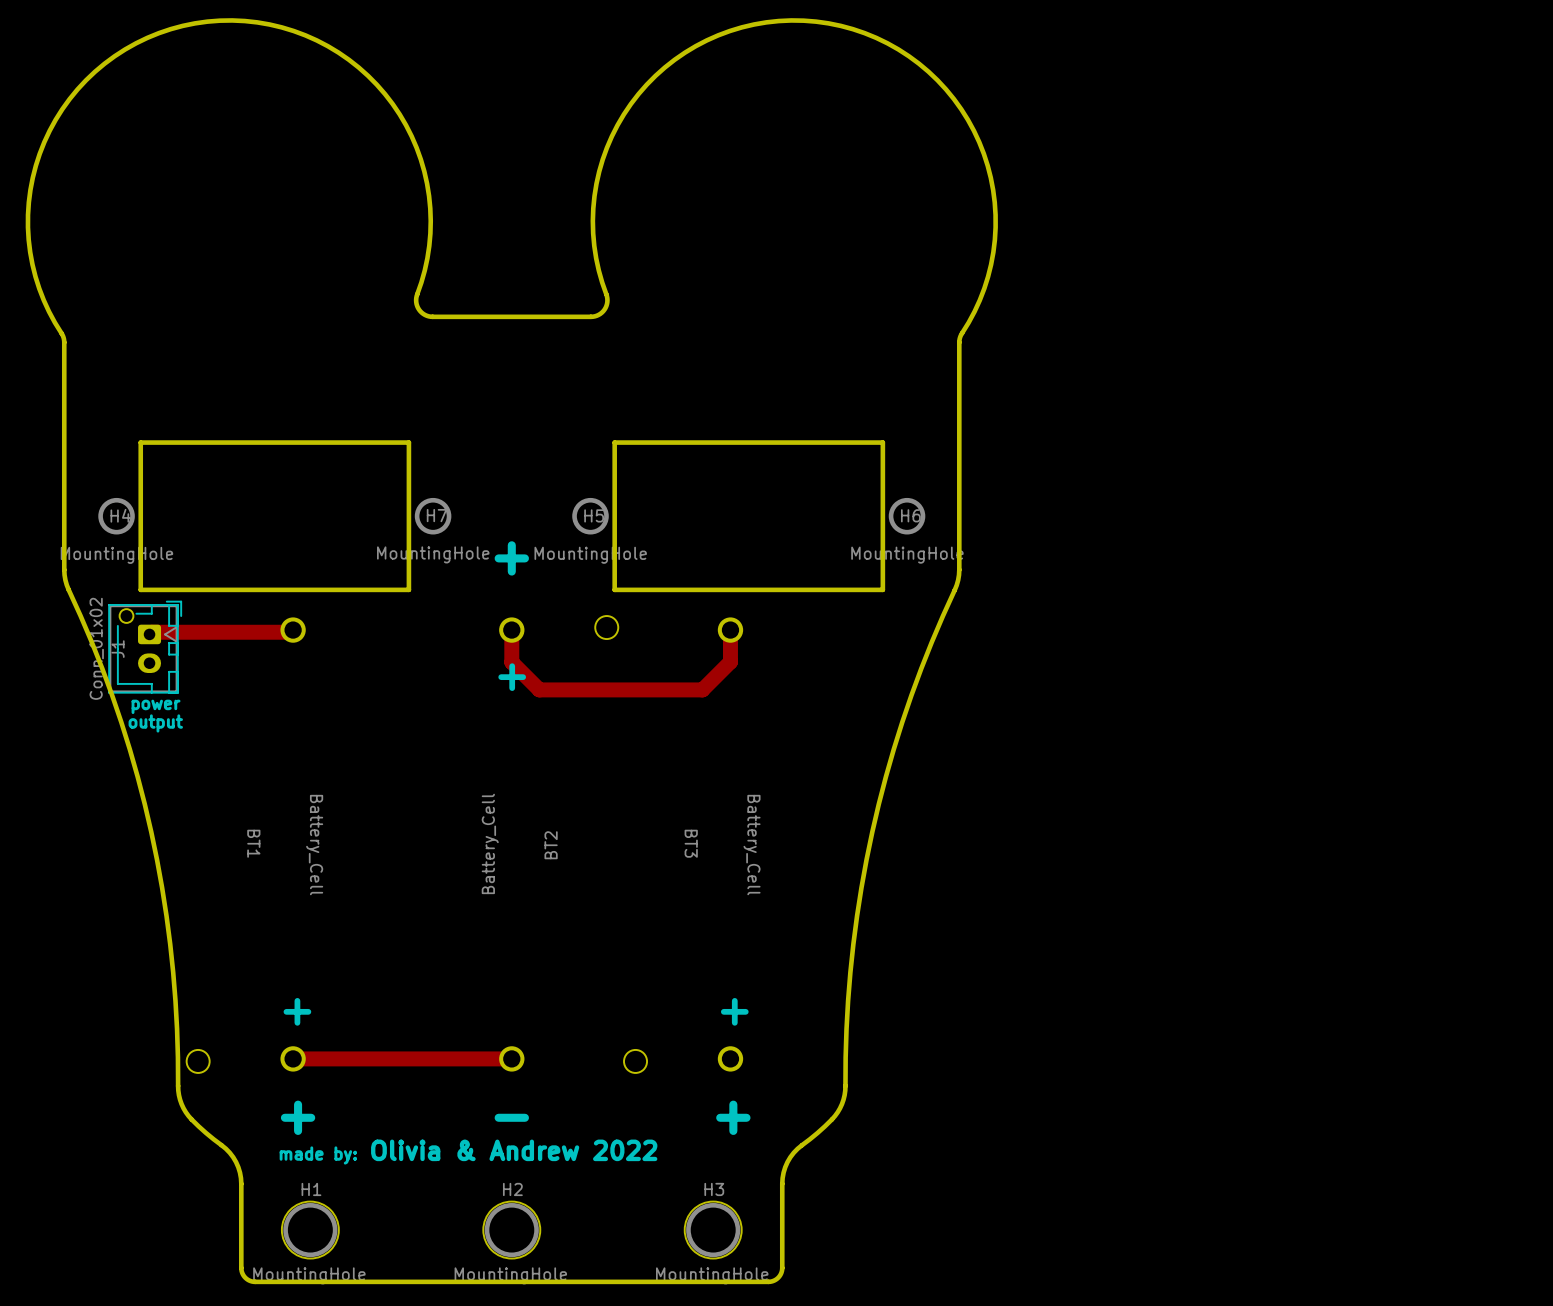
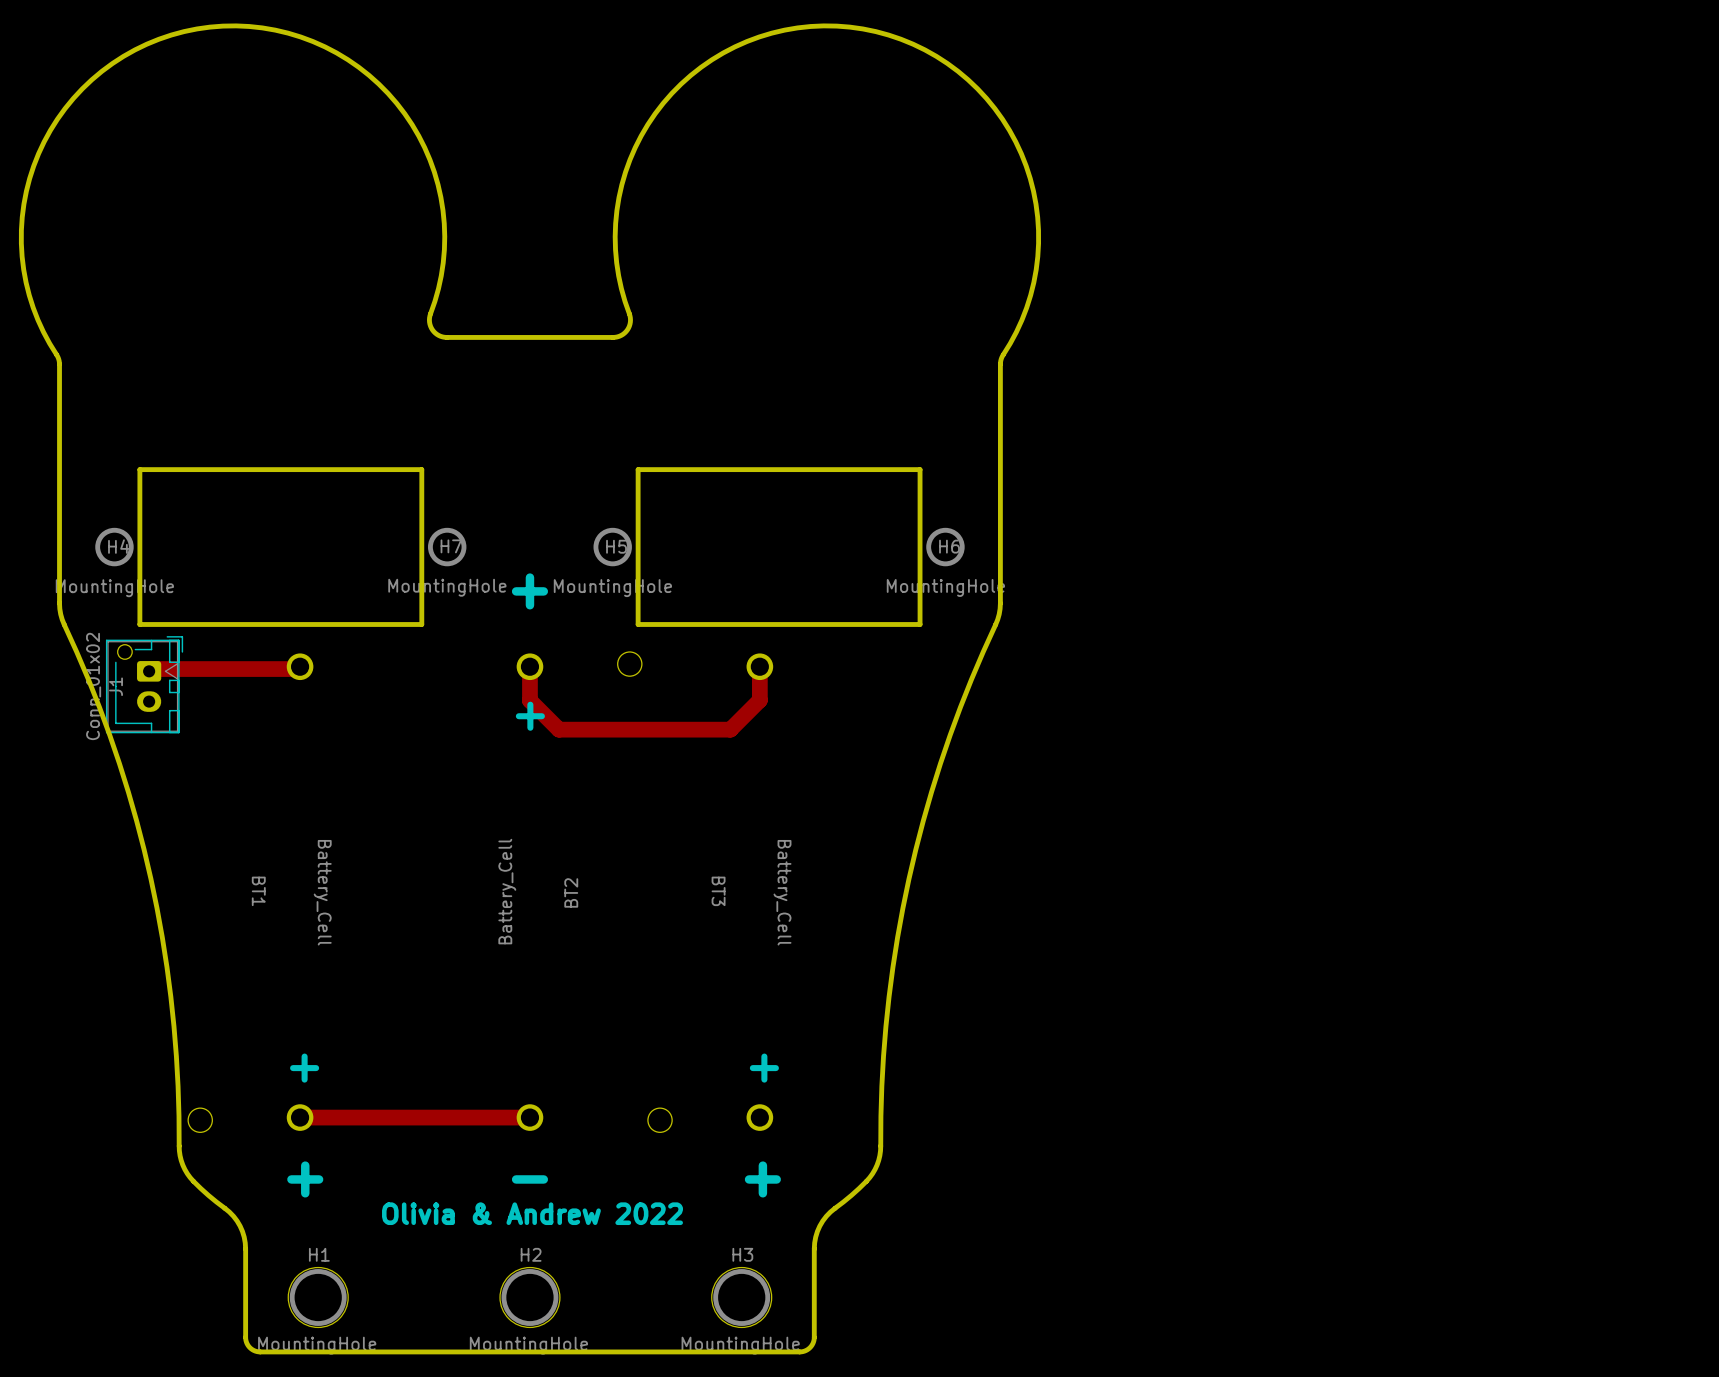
text: power (156, 706) -> none
text: output (155, 723) -> none
text: made by: (318, 1155) -> none

